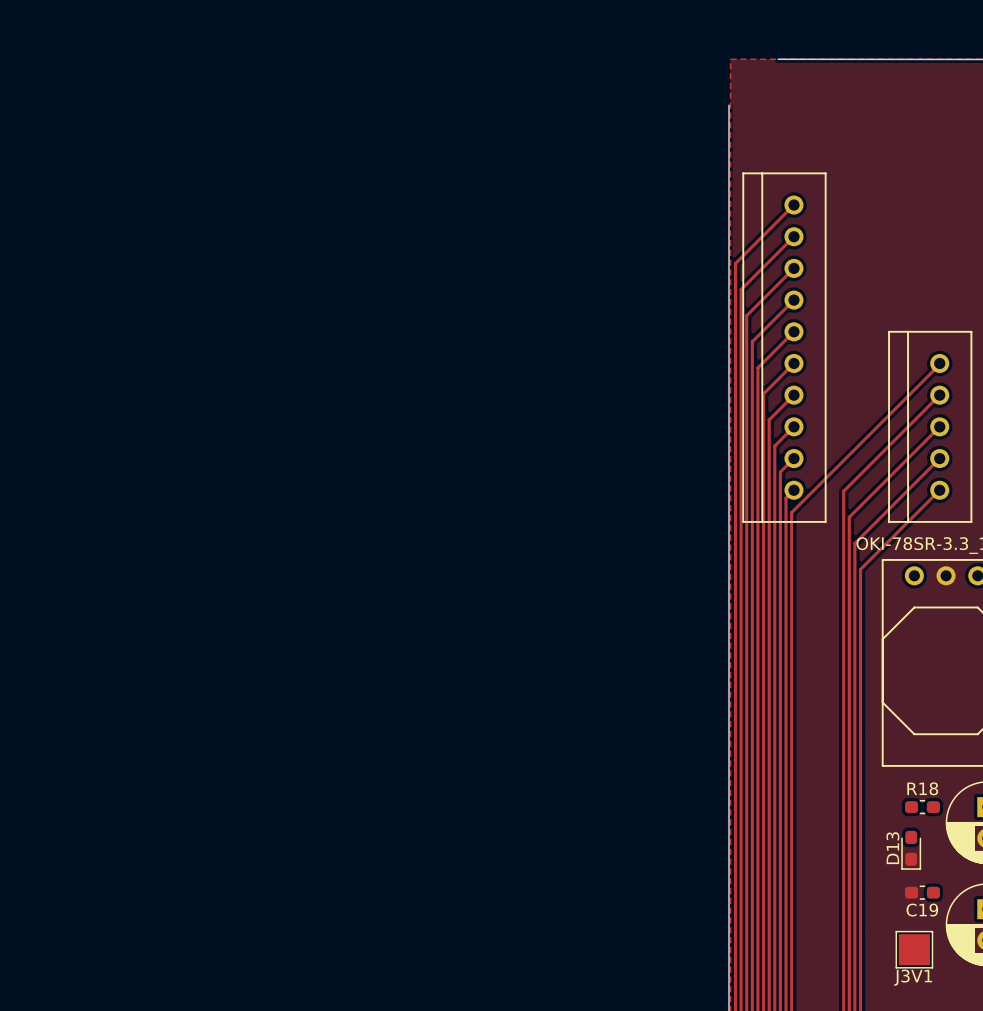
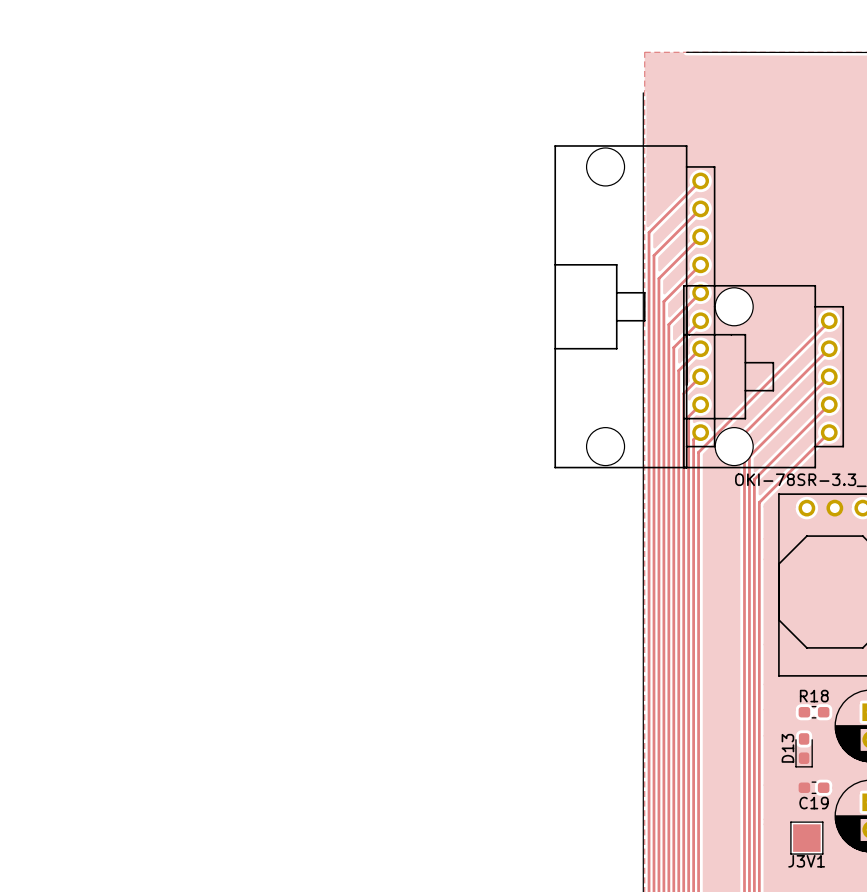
part: none -> (634, 306)
part: (784, 347) -> none
part: none -> (763, 376)
part: (930, 426) -> none

